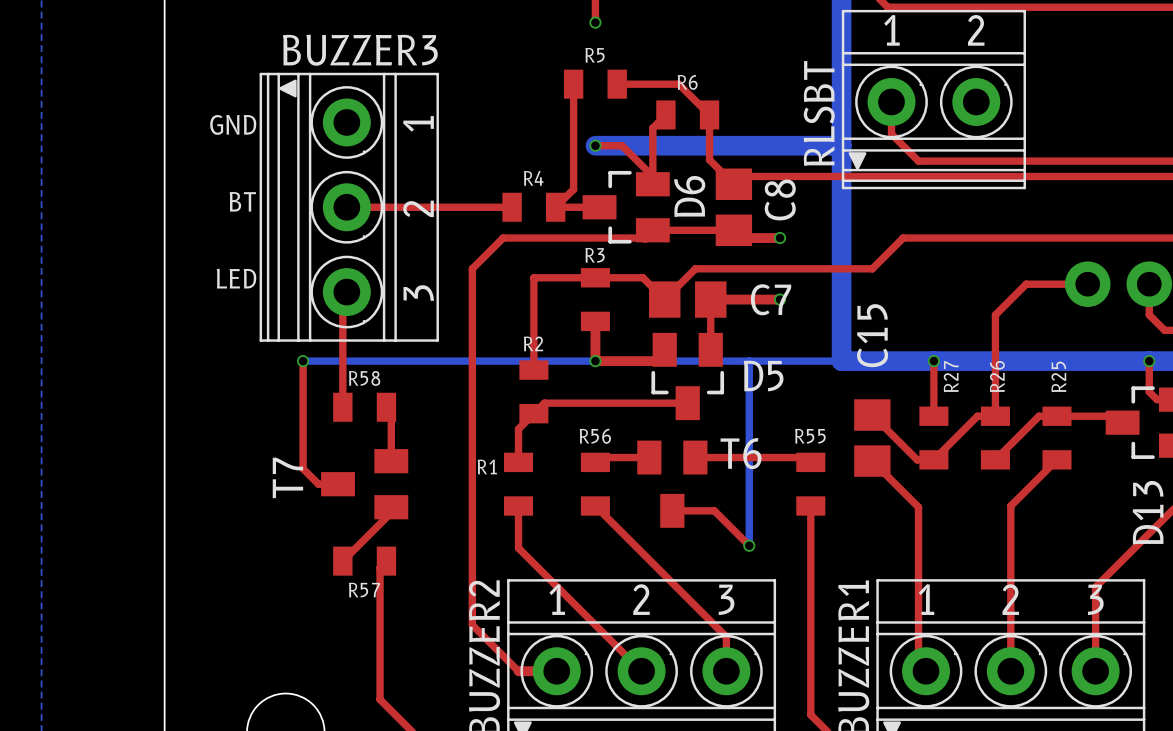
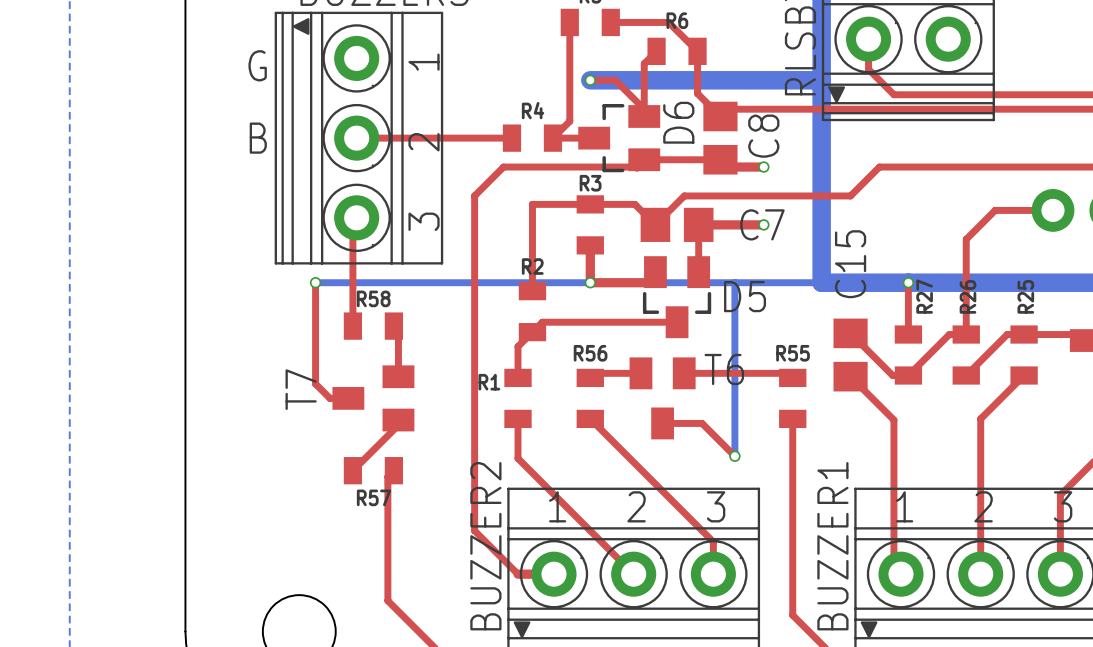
BUZZER3 text: GND (233, 124) -> none
BUZZER3 text: none -> G (257, 65)
BUZZER3 text: BT (242, 201) -> none
BUZZER3 text: none -> B (258, 138)
BUZZER3 text: LED (236, 278) -> none

